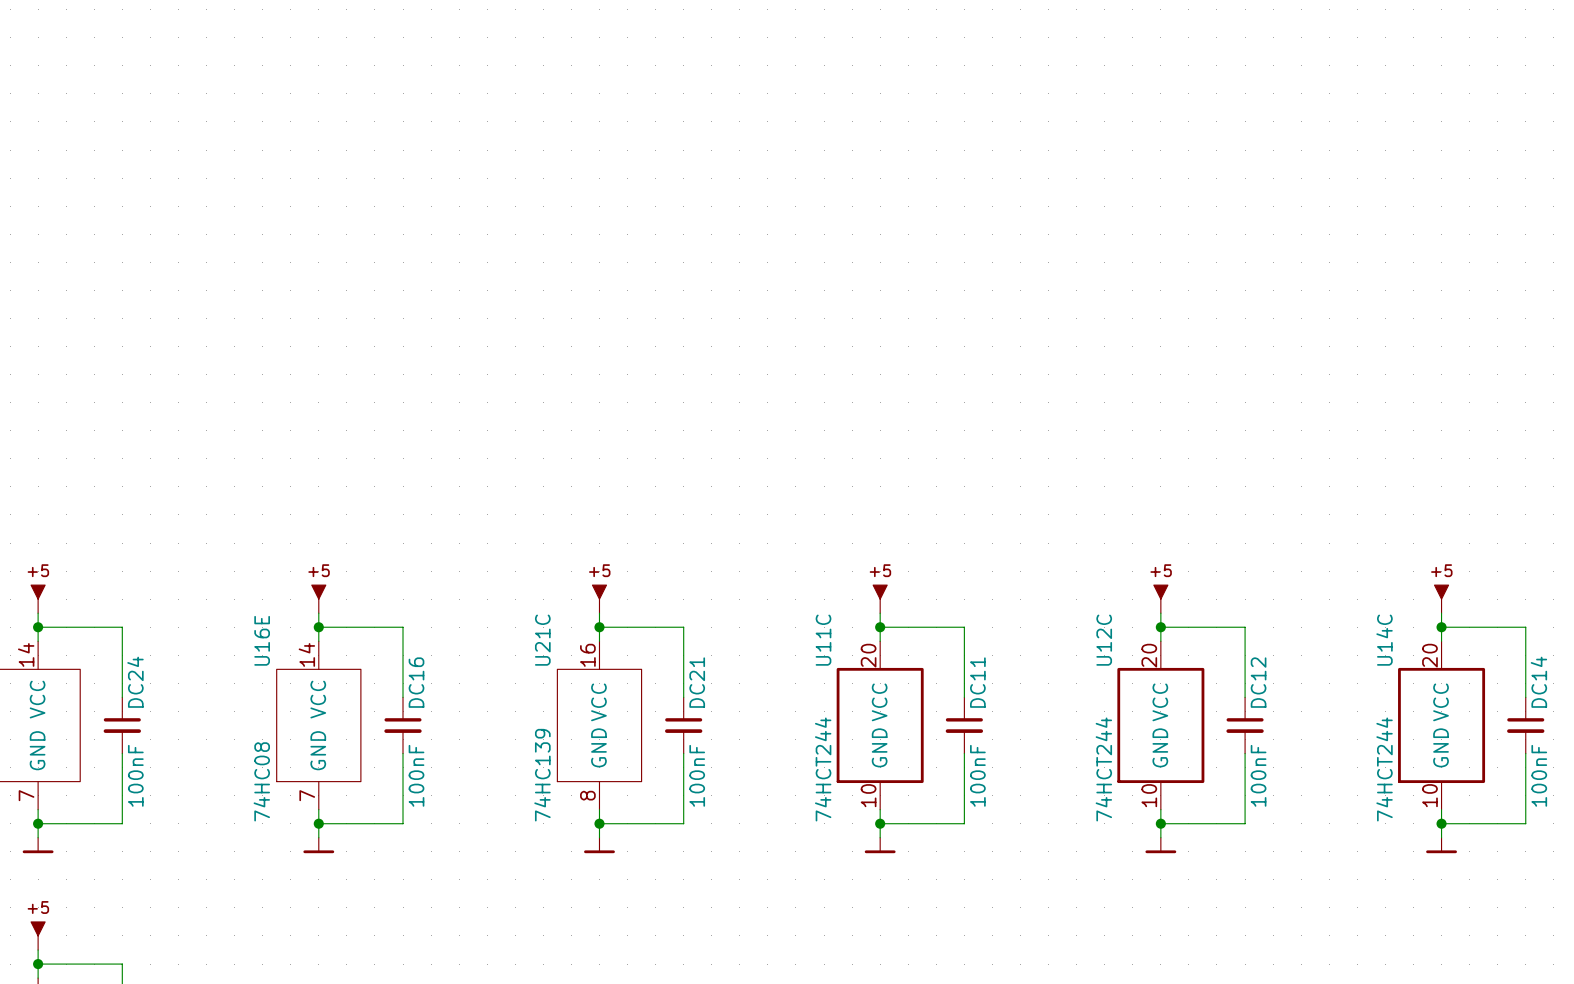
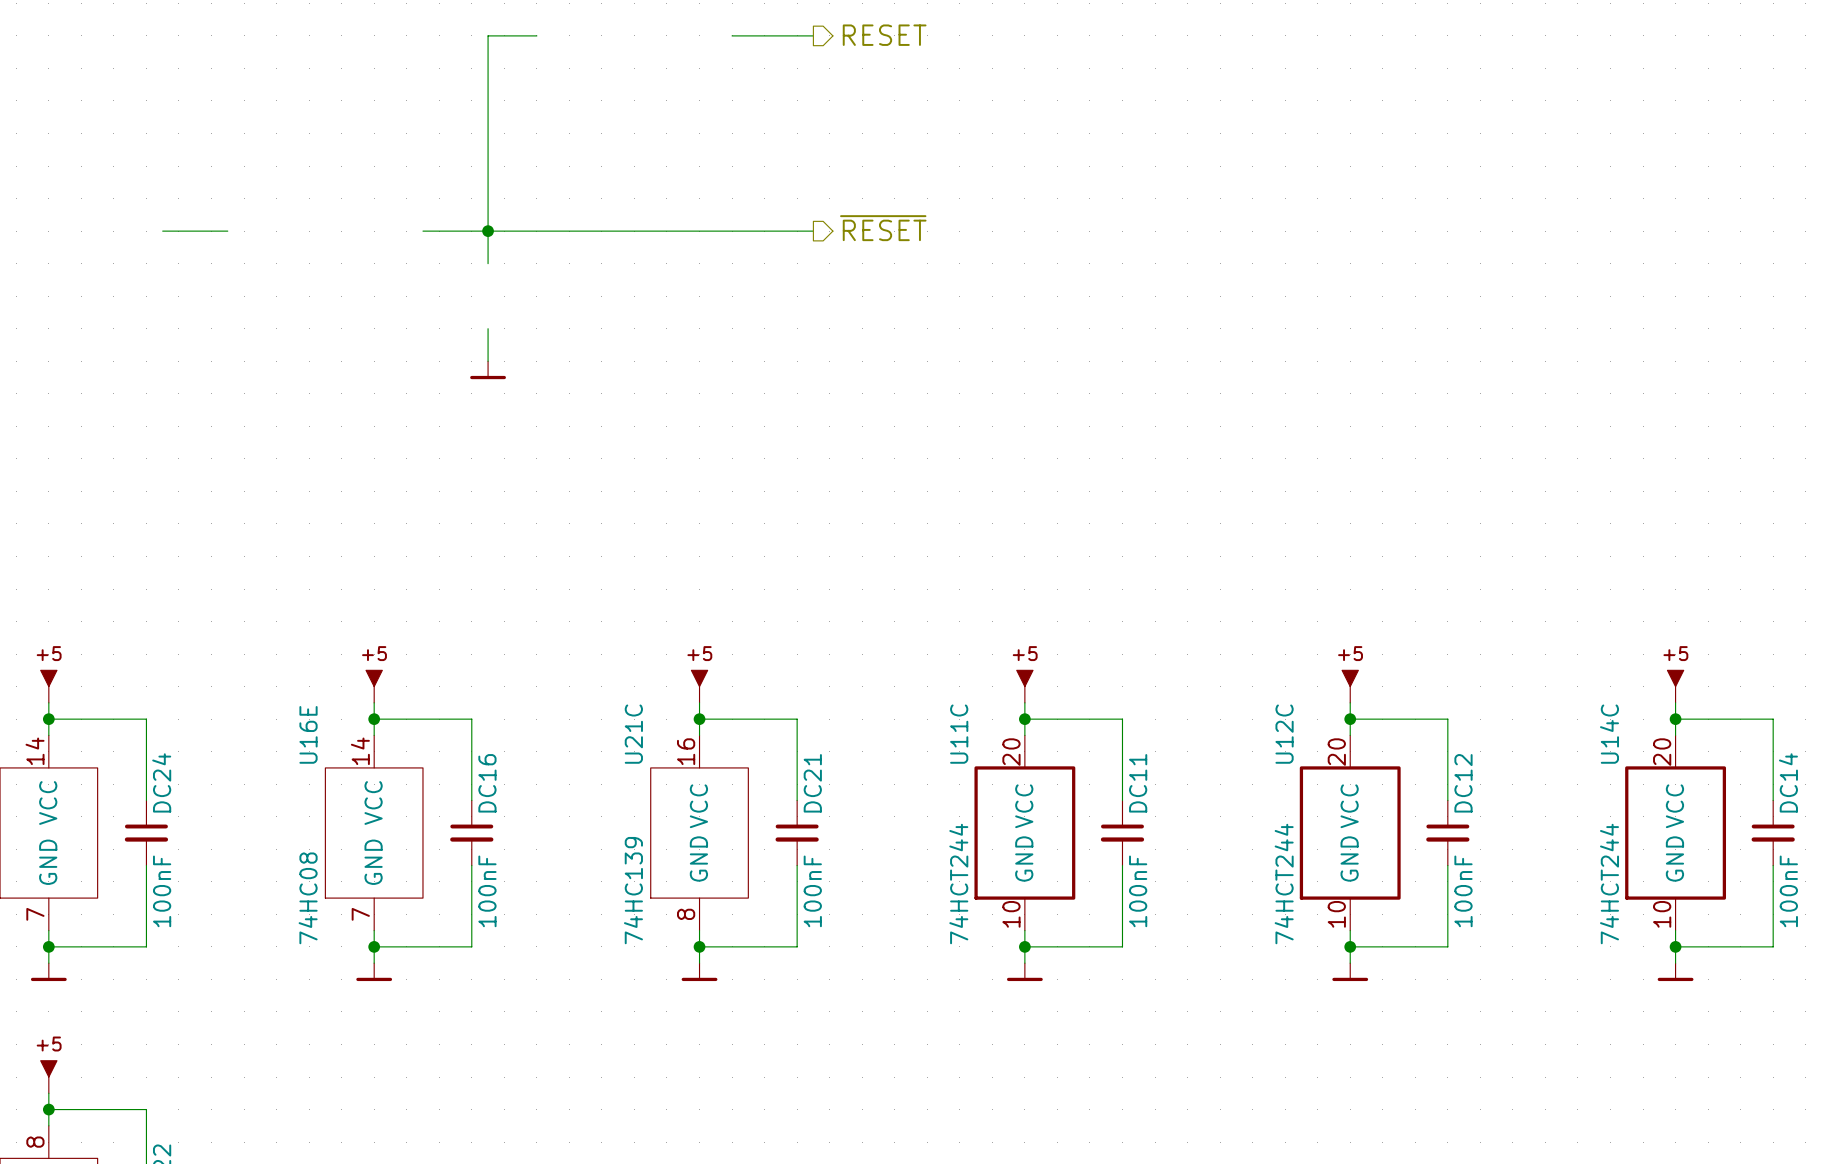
wire: none -> (536, 35) (488, 35) (488, 263)
wire: none -> (732, 35) (813, 35)
hierarchical label: none -> RESET (884, 35)
hierarchical label: none -> ~{RESET} (883, 228)
wire: none -> (162, 231) (227, 231)
wire: none -> (422, 231) (813, 231)
junction: none -> (488, 231)
wire: none -> (488, 328) (488, 361)
power symbol: none -> (488, 370)

